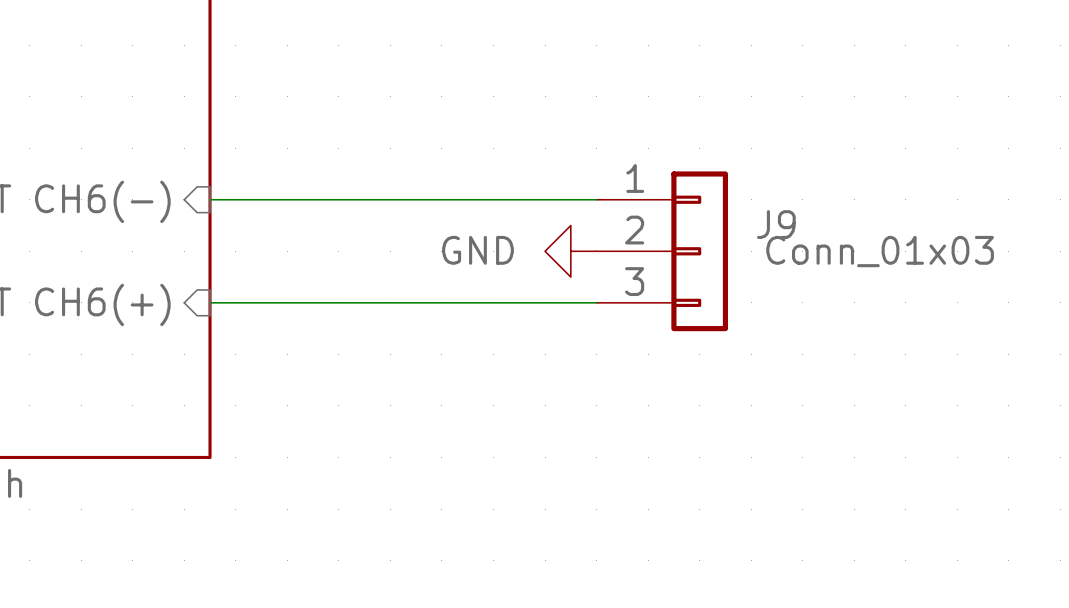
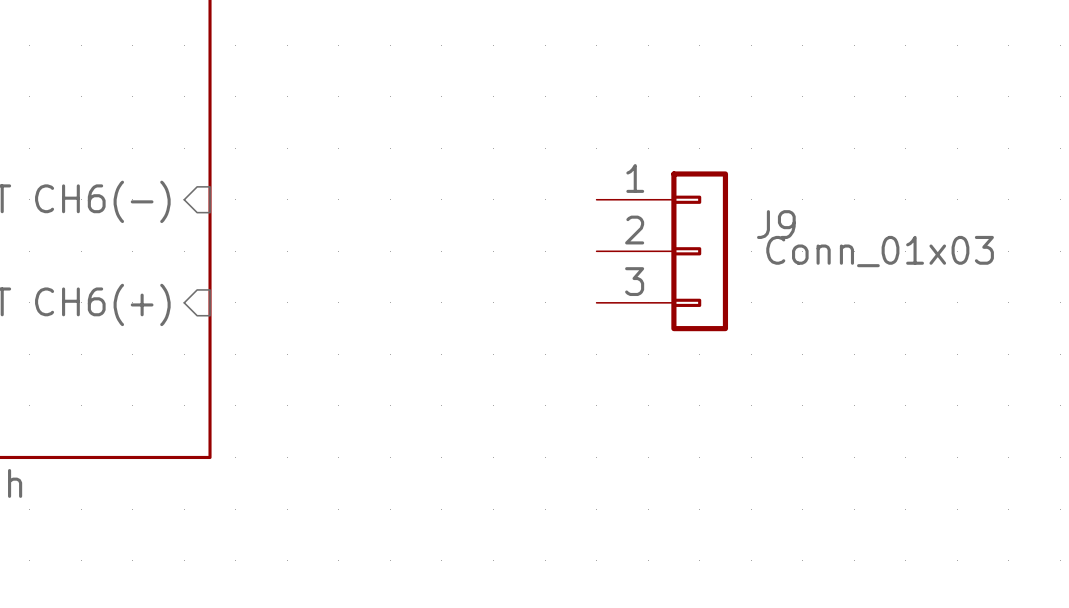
wire: (210, 199) (596, 199) -> none
power symbol: GND (570, 251) -> none
wire: (210, 302) (596, 302) -> none

